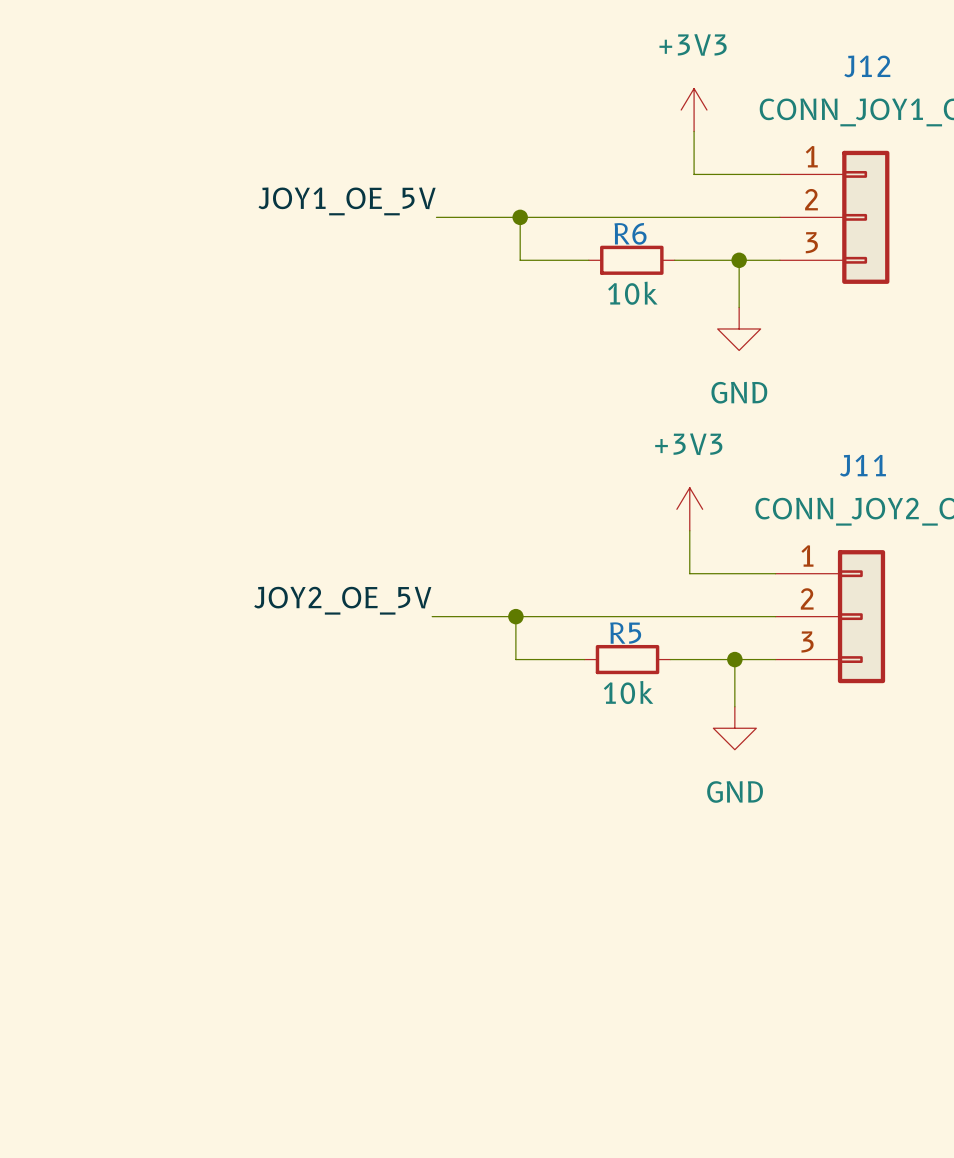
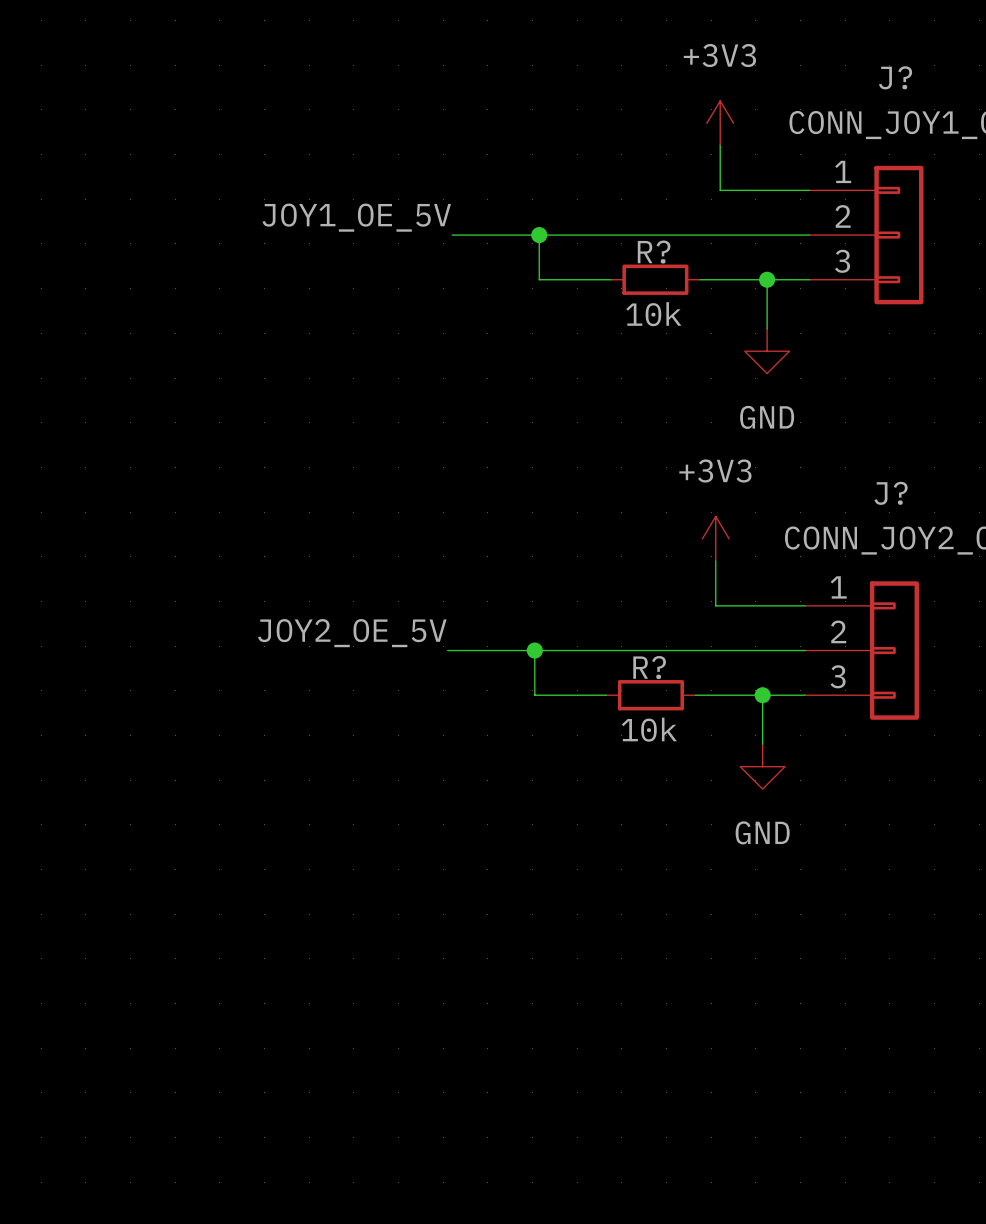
J12 name: J12 (867, 66) -> J? (895, 77)
R6 name: R6 (630, 233) -> R? (654, 252)
J11 name: J11 (862, 465) -> J? (891, 493)
R5 name: R5 (625, 633) -> R? (649, 667)

